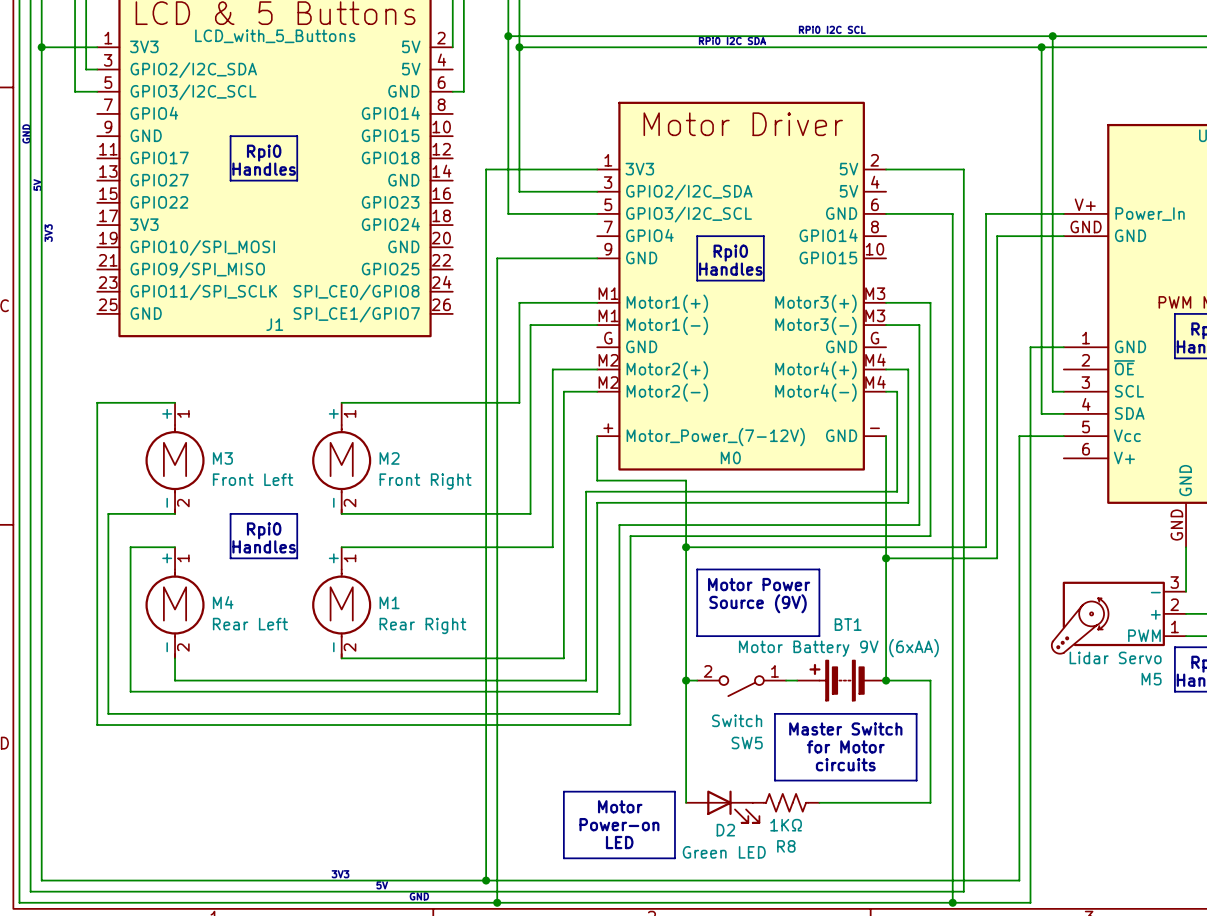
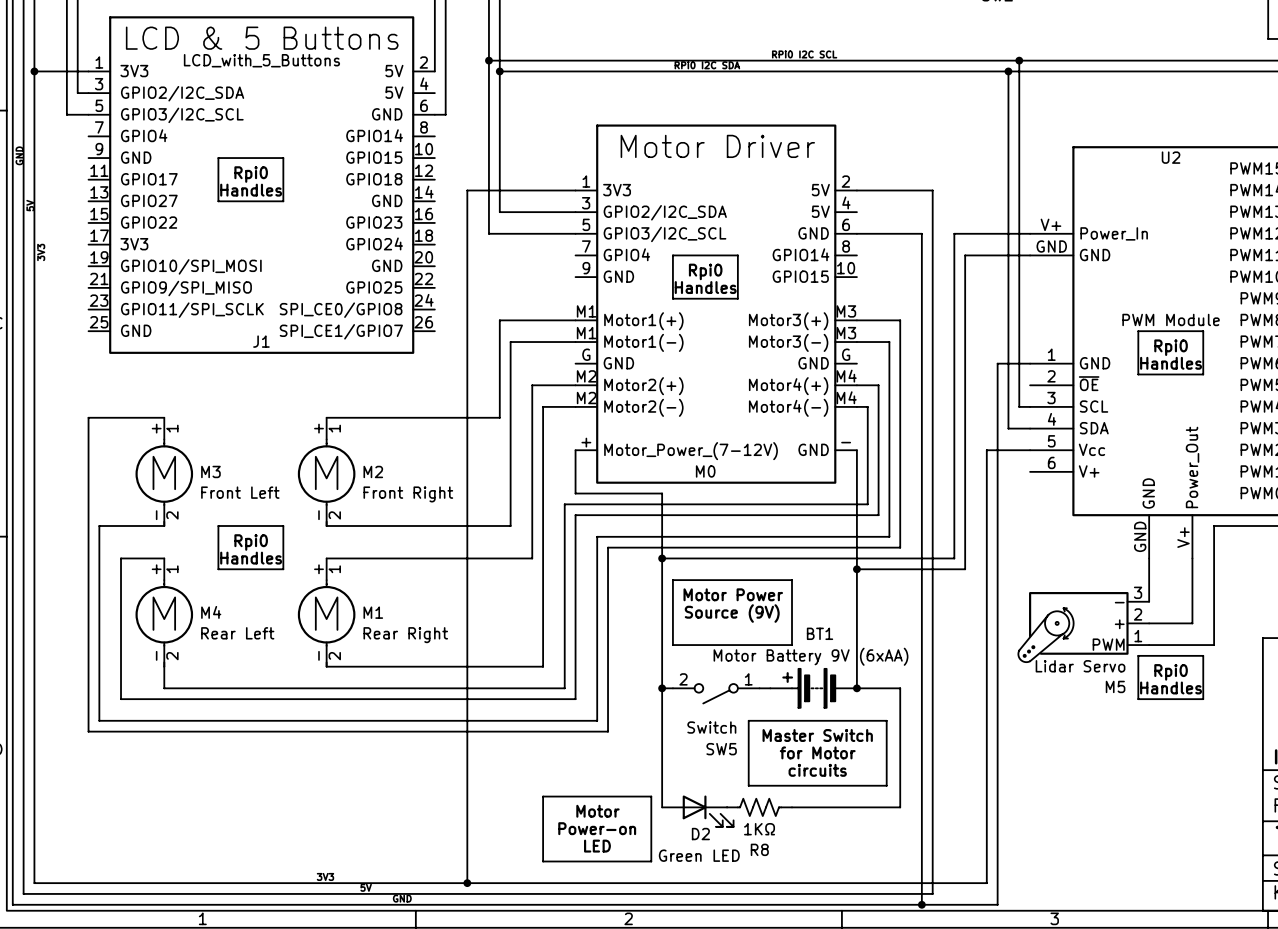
wire: (597, 258) (497, 258) (497, 902) -> none
junction: (497, 902) -> none

